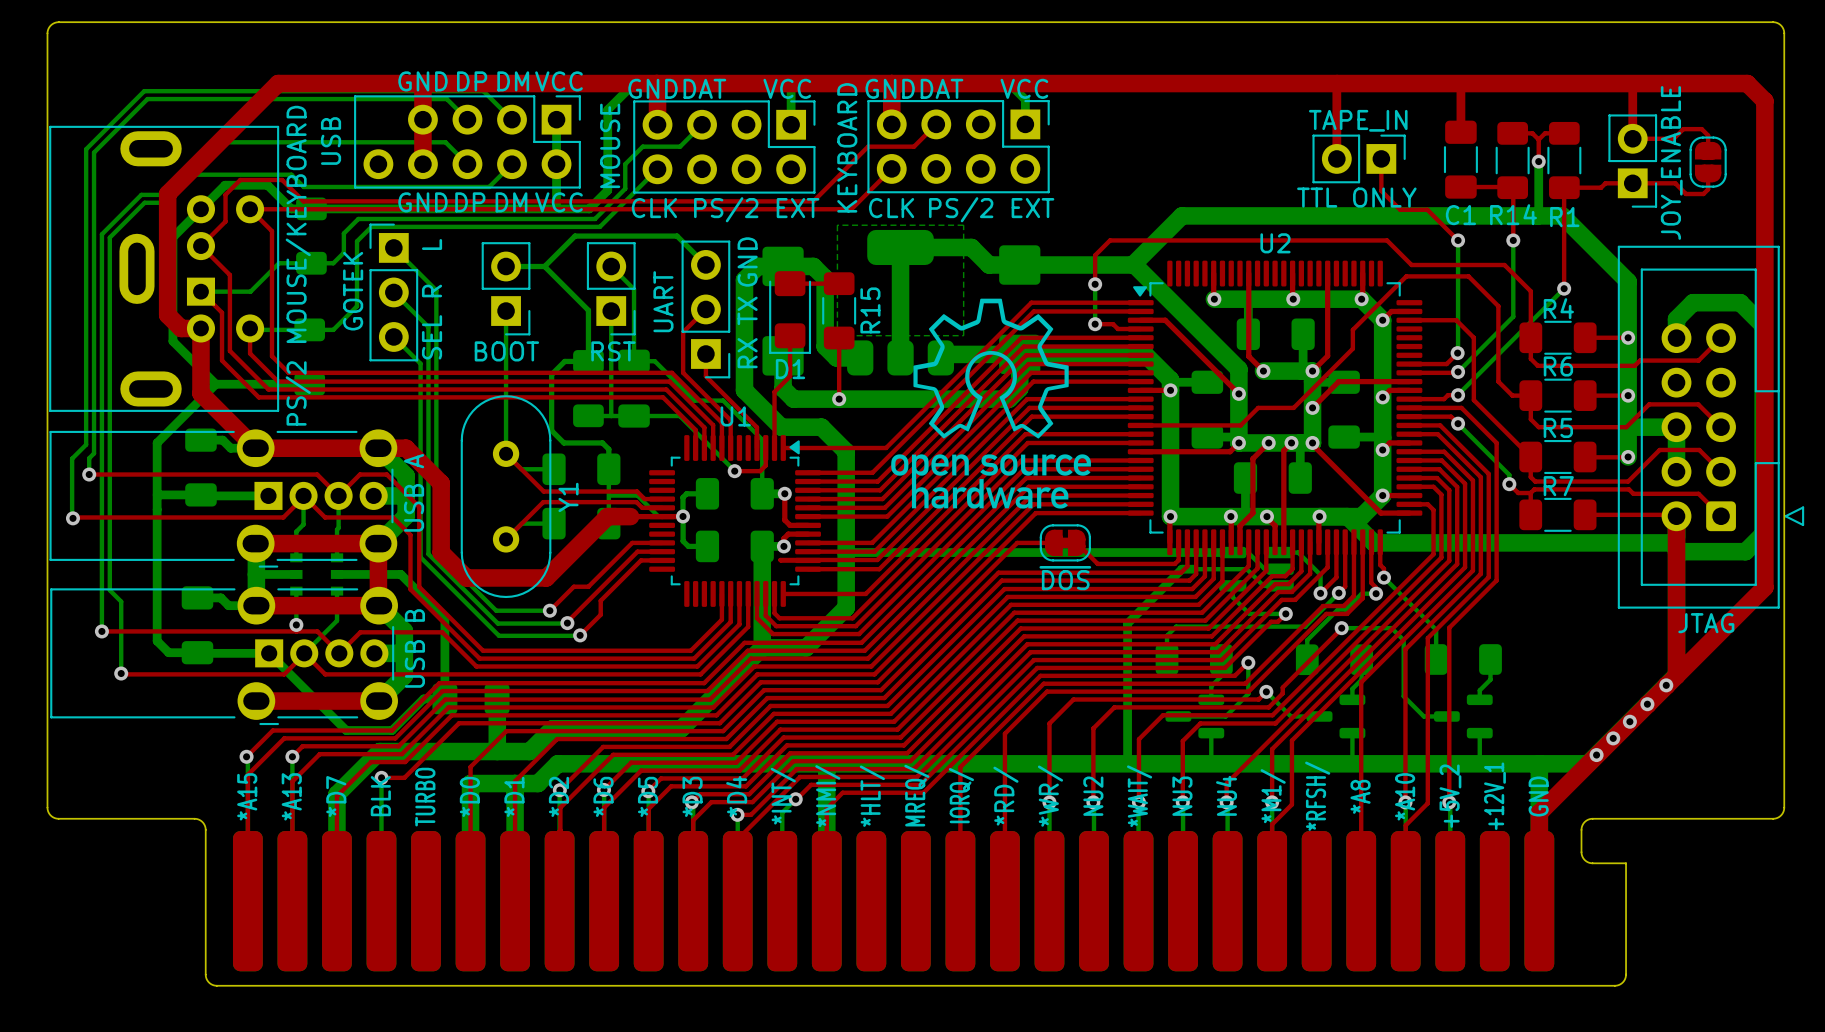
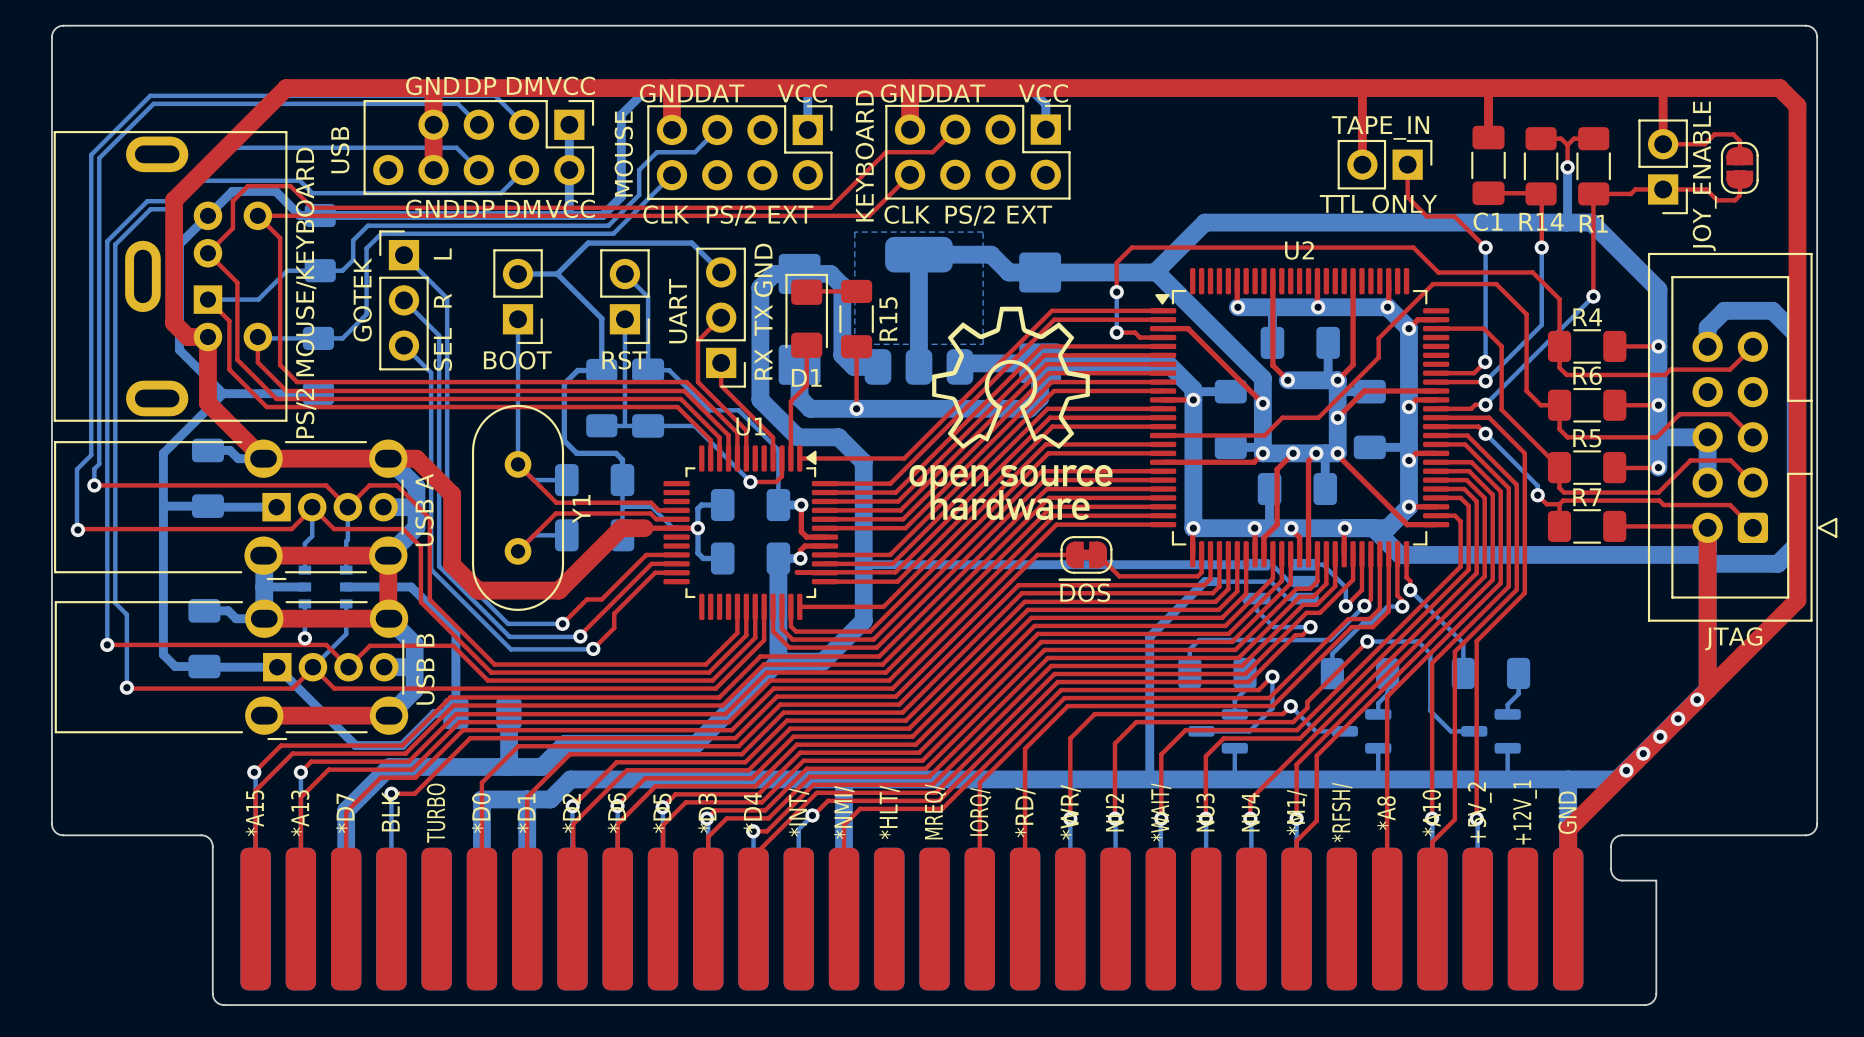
D1 rotation: 0° (790, 312) -> 180° (806, 315)

